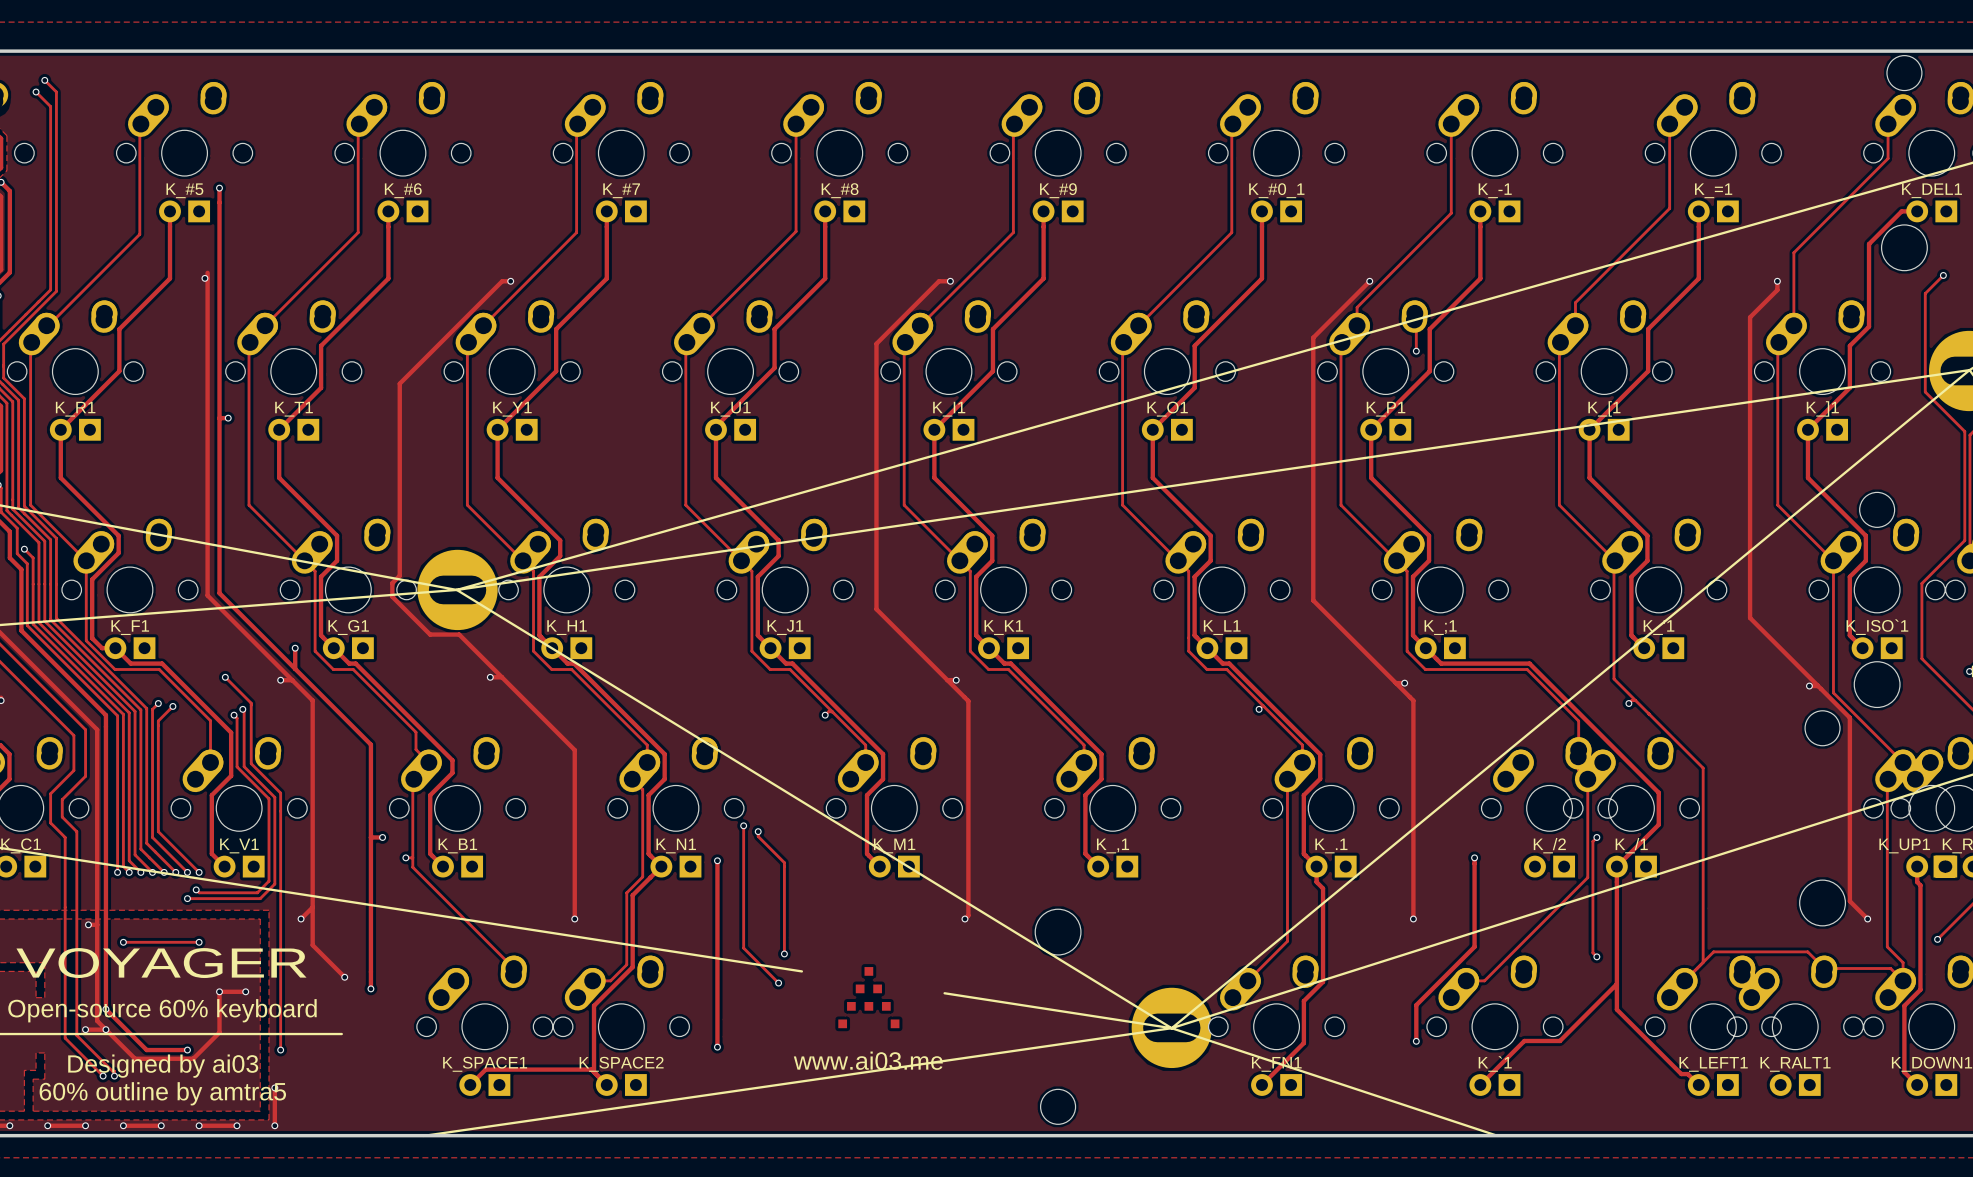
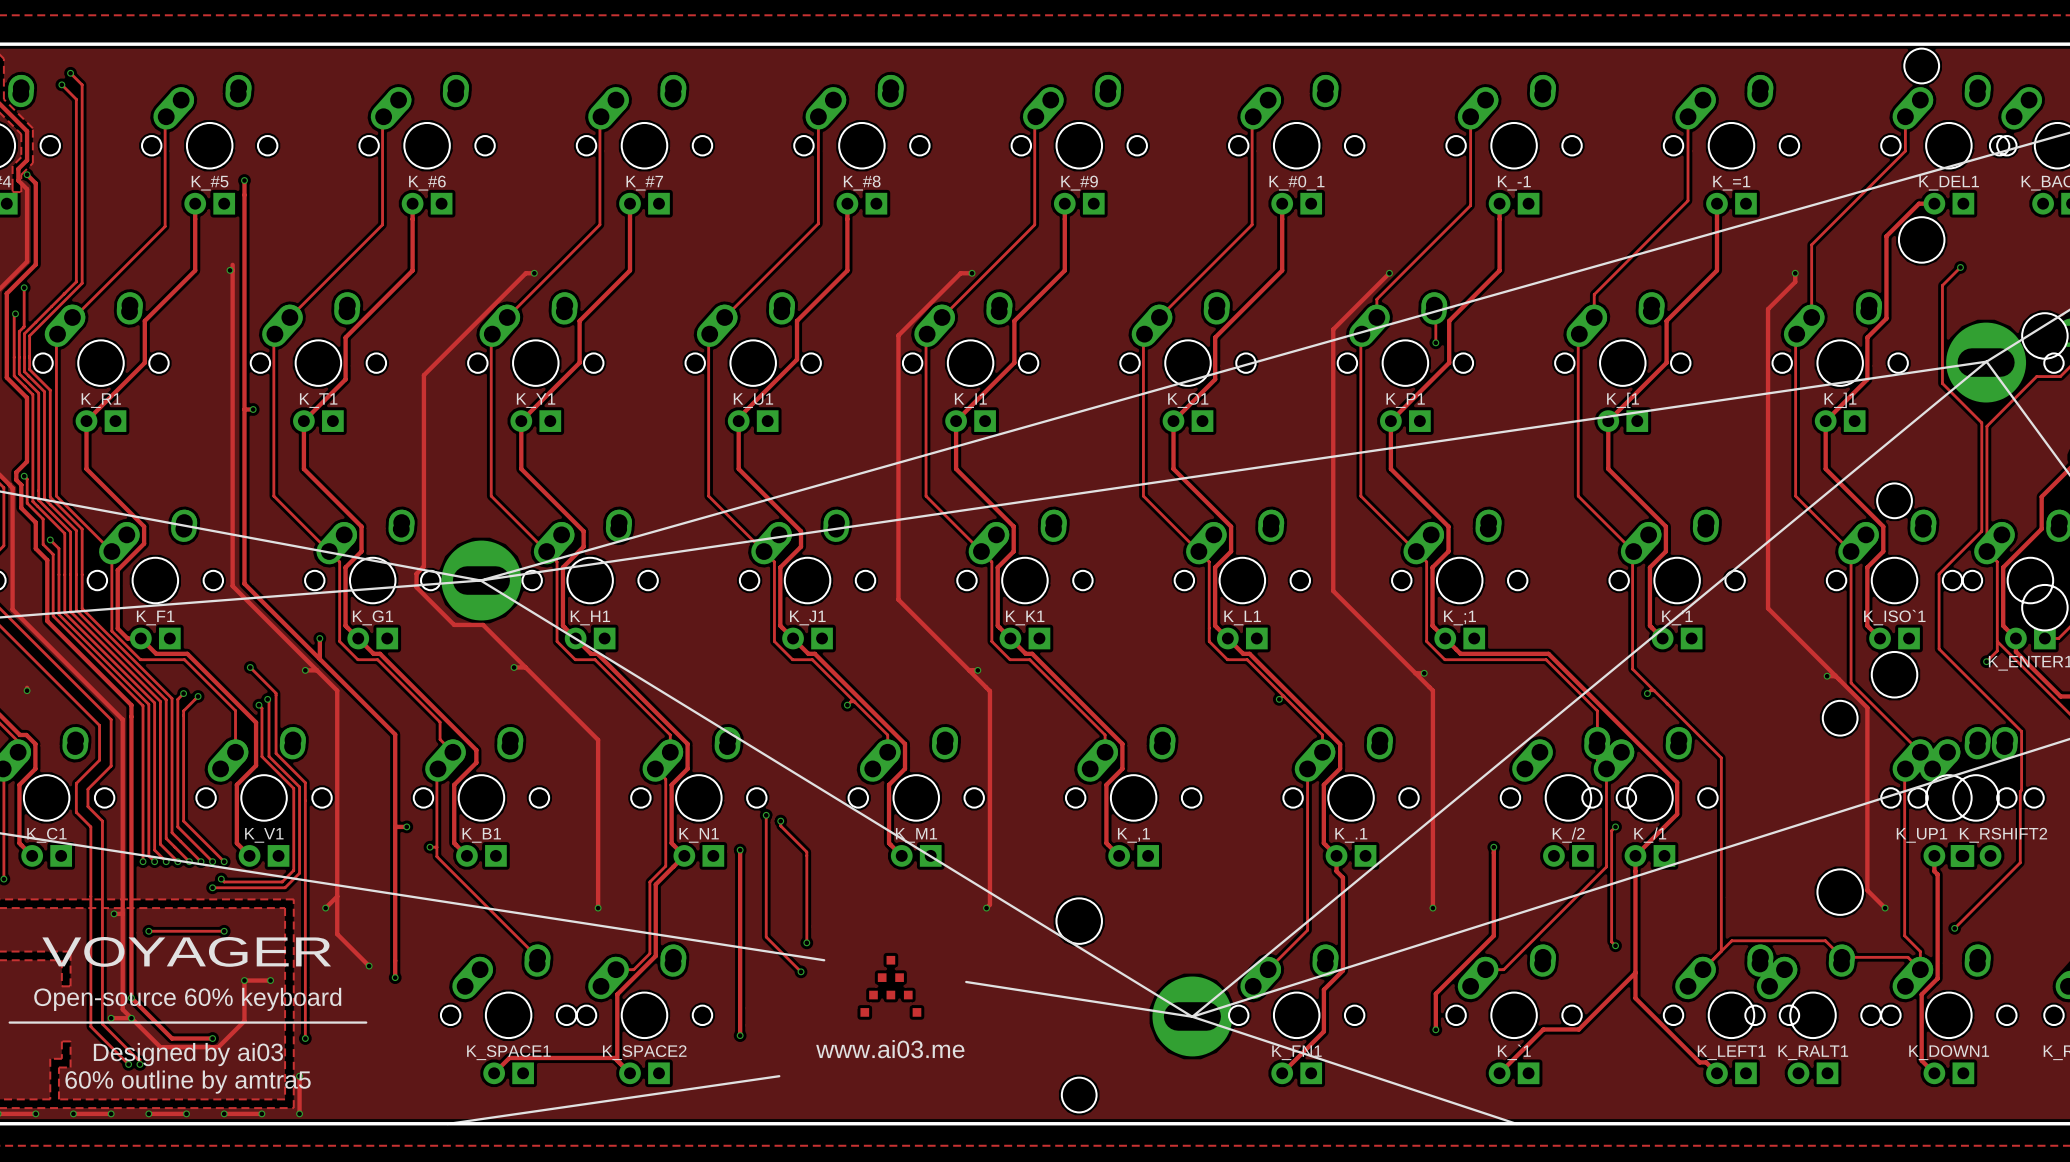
line: (1171, 1028) (423, 1135) -> (779, 1076) (447, 1124)

